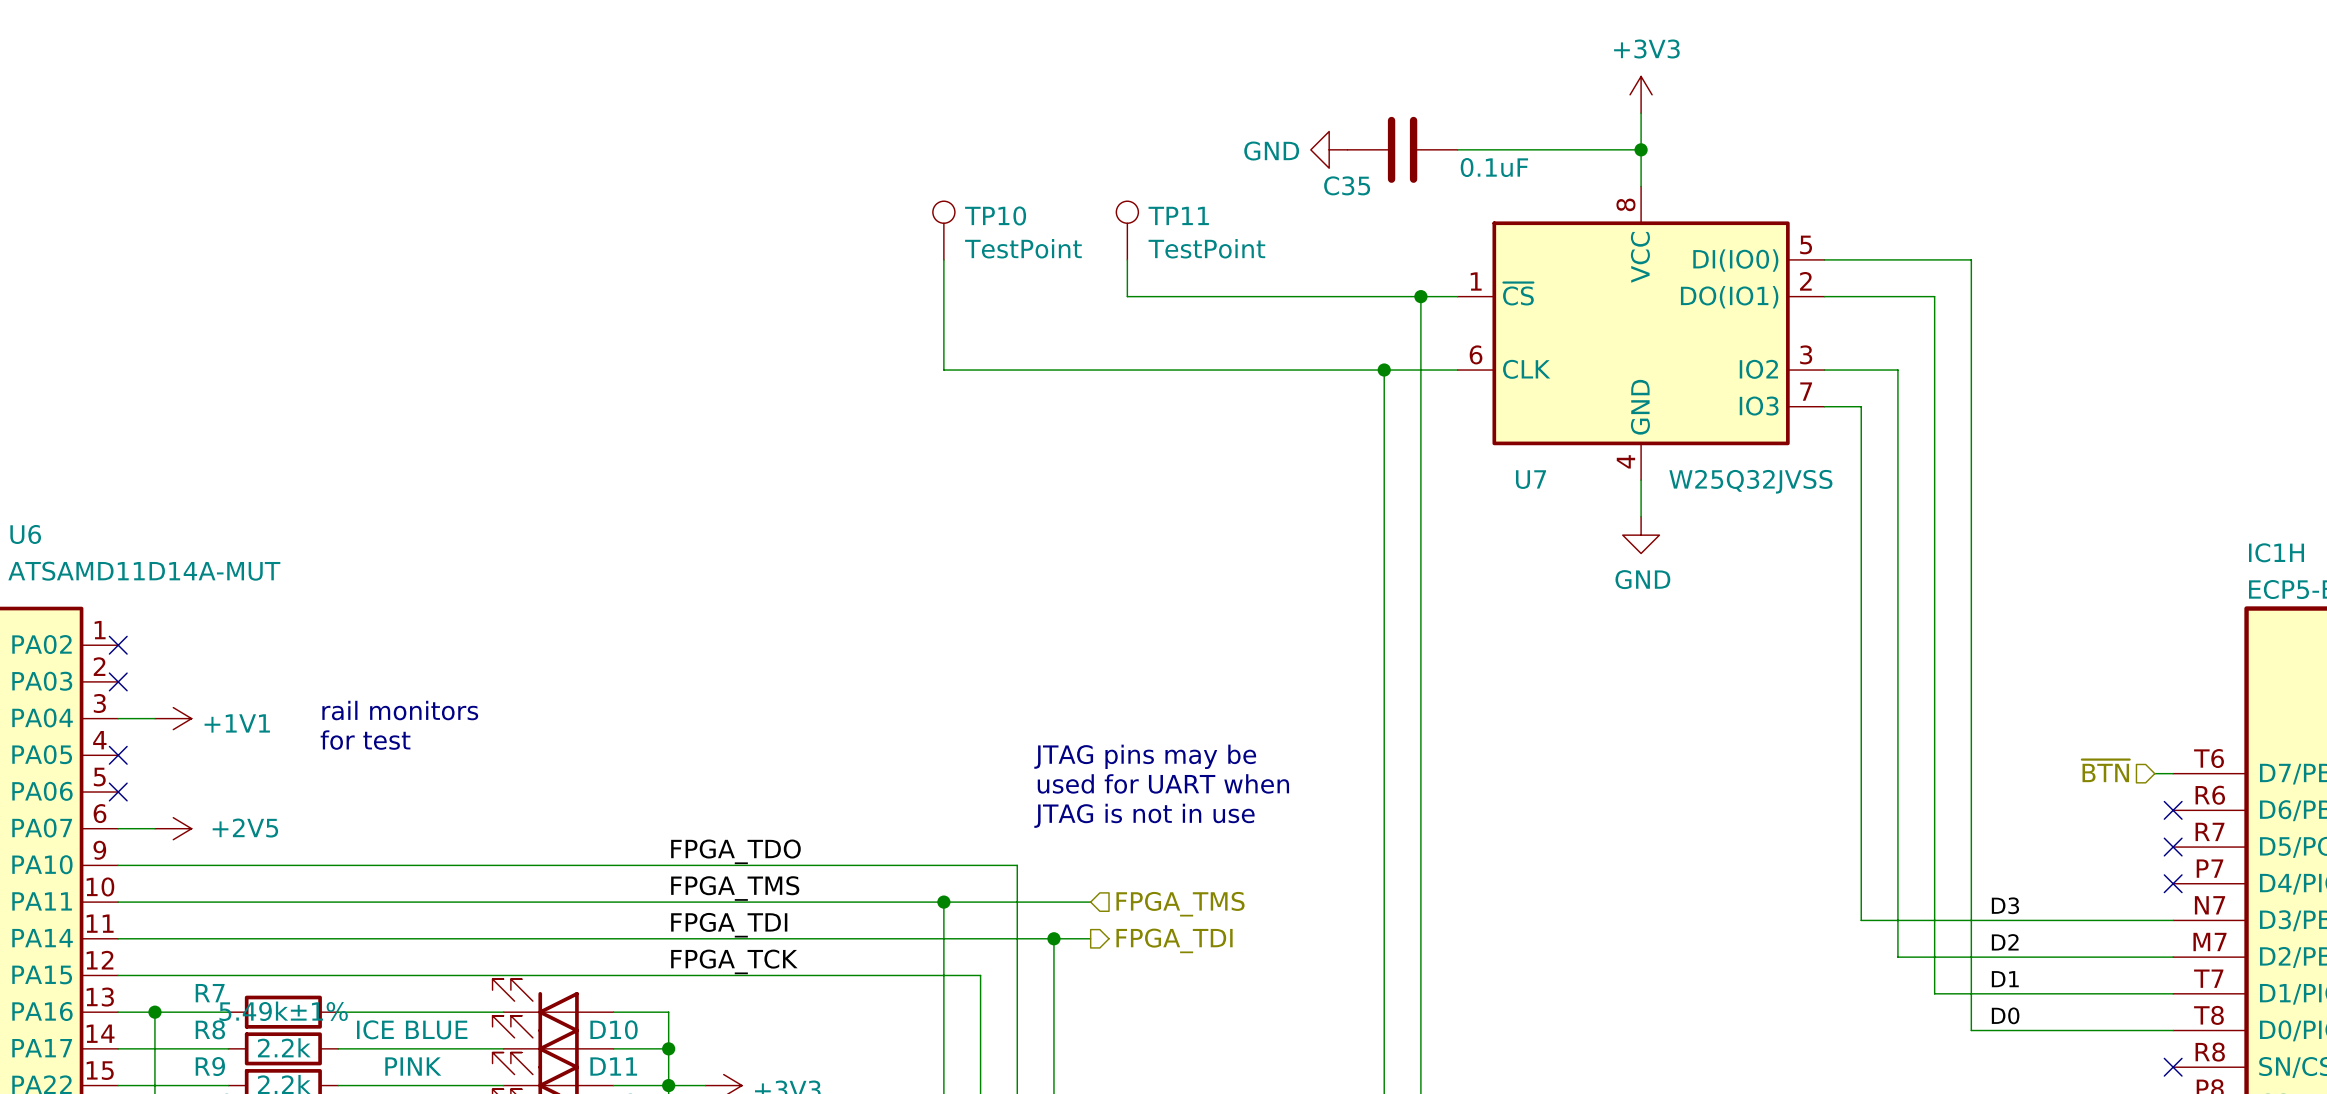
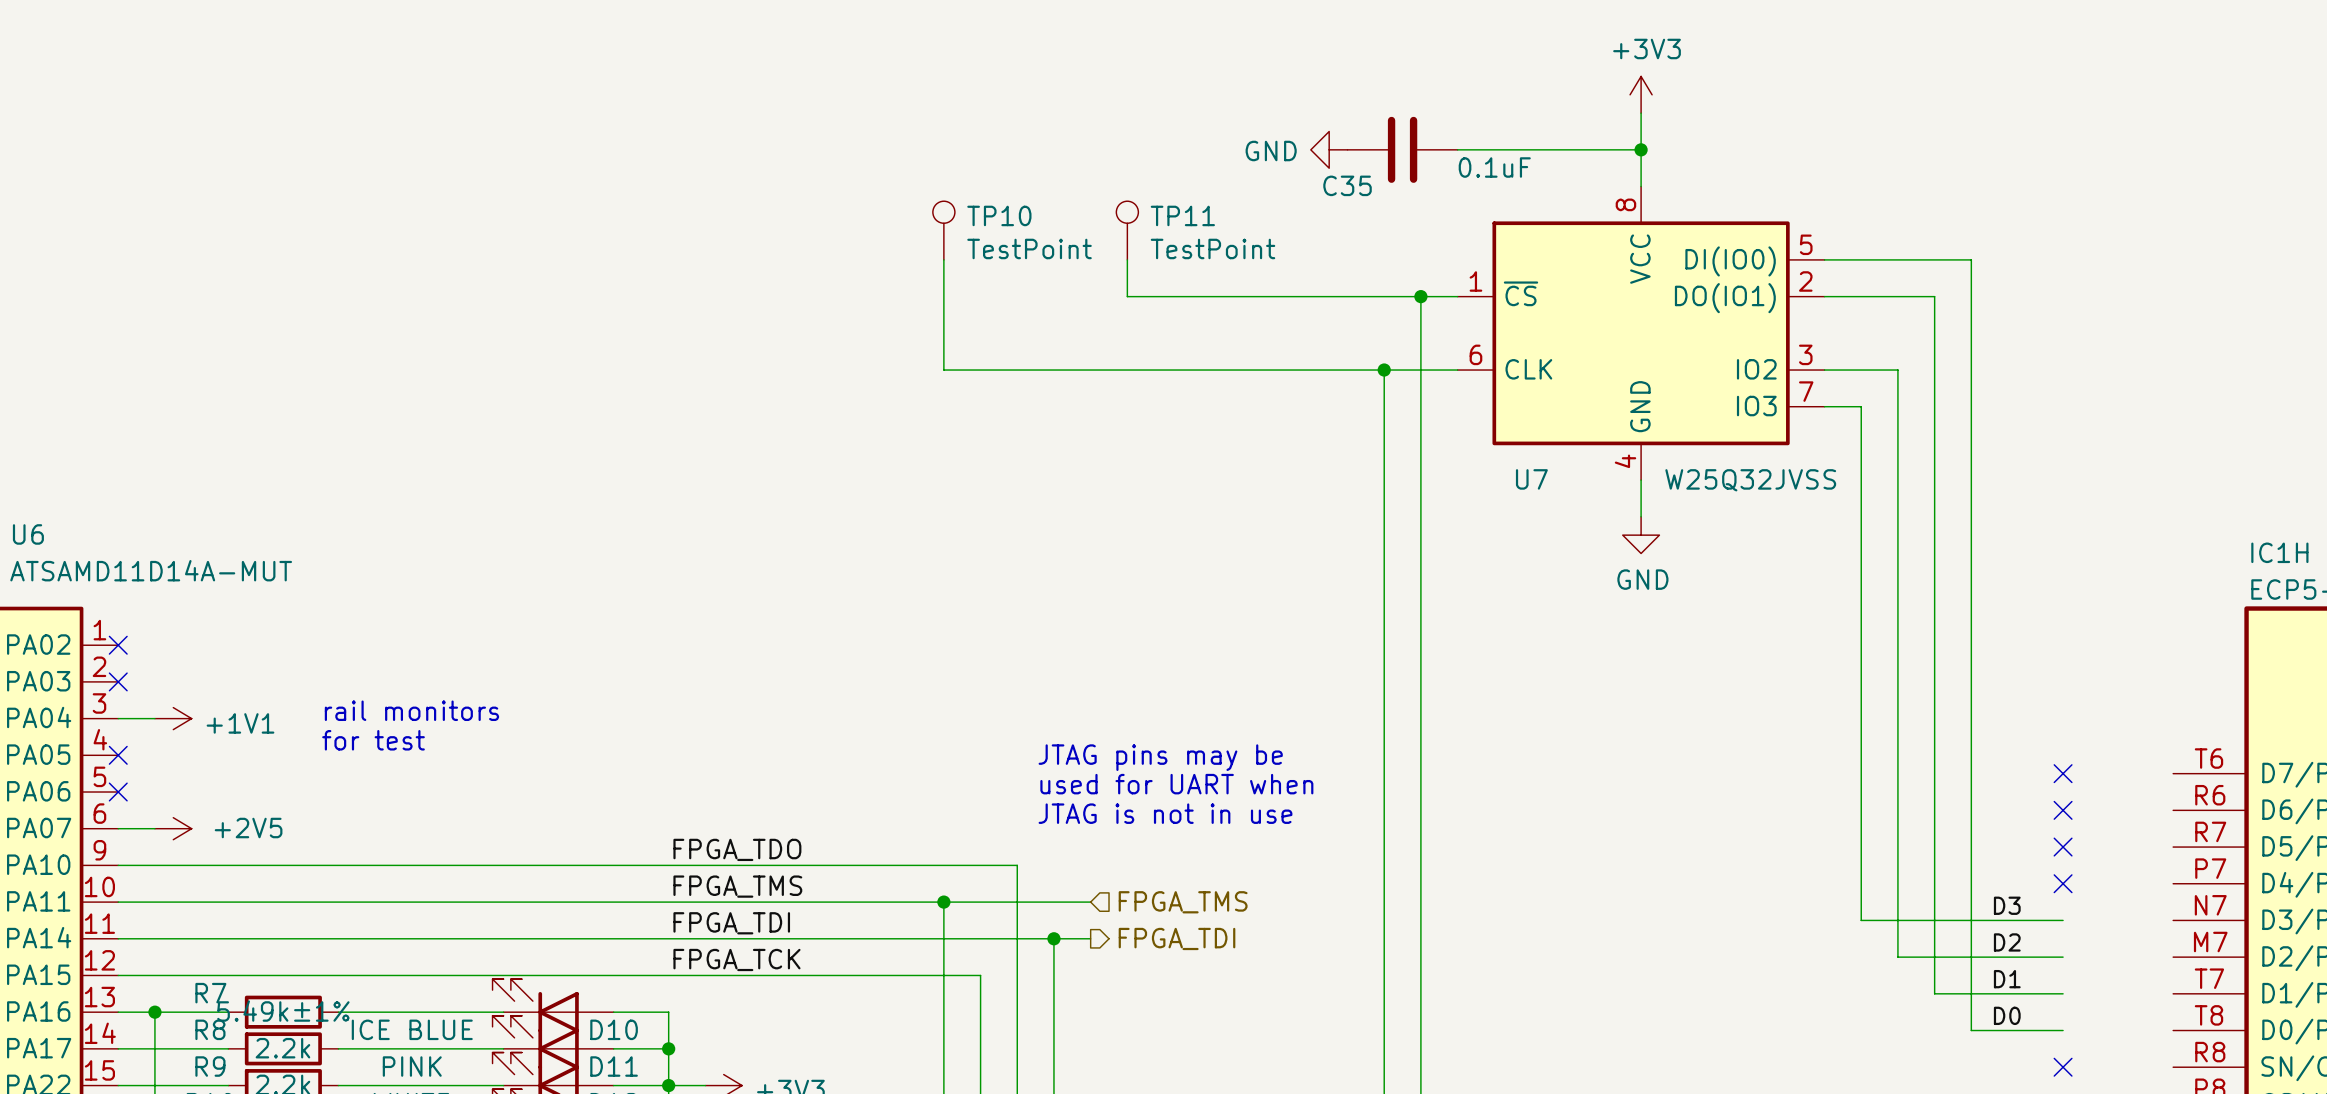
hierarchical label: ~{BTN} (2105, 770) -> none
no-connect mark: none -> (2063, 773)
wire: (2154, 773) (2173, 773) -> none
no-connect mark: none -> (2063, 810)
no-connect mark: (2173, 810) -> none
no-connect mark: none -> (2063, 847)
no-connect mark: (2173, 847) -> none
no-connect mark: none -> (2063, 883)
no-connect mark: (2173, 883) -> none
wire: (2063, 920) (2173, 920) -> none
wire: (2063, 957) (2173, 957) -> none
wire: (2063, 993) (2173, 993) -> none
wire: (2063, 1030) (2173, 1030) -> none
no-connect mark: none -> (2063, 1067)
no-connect mark: (2173, 1067) -> none

